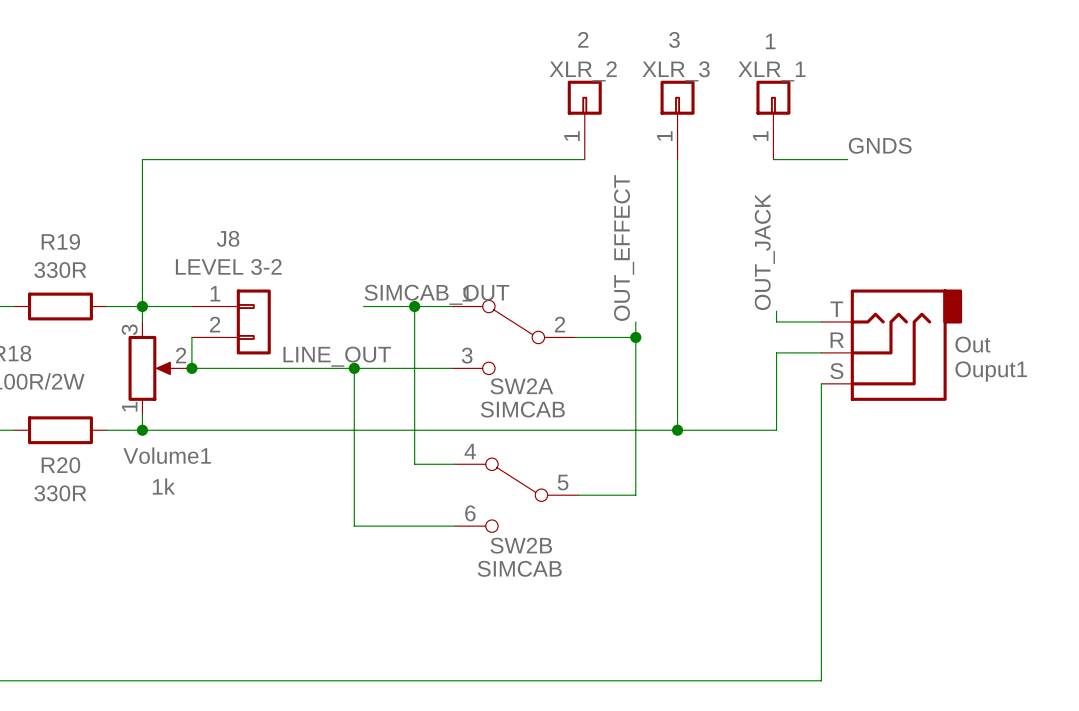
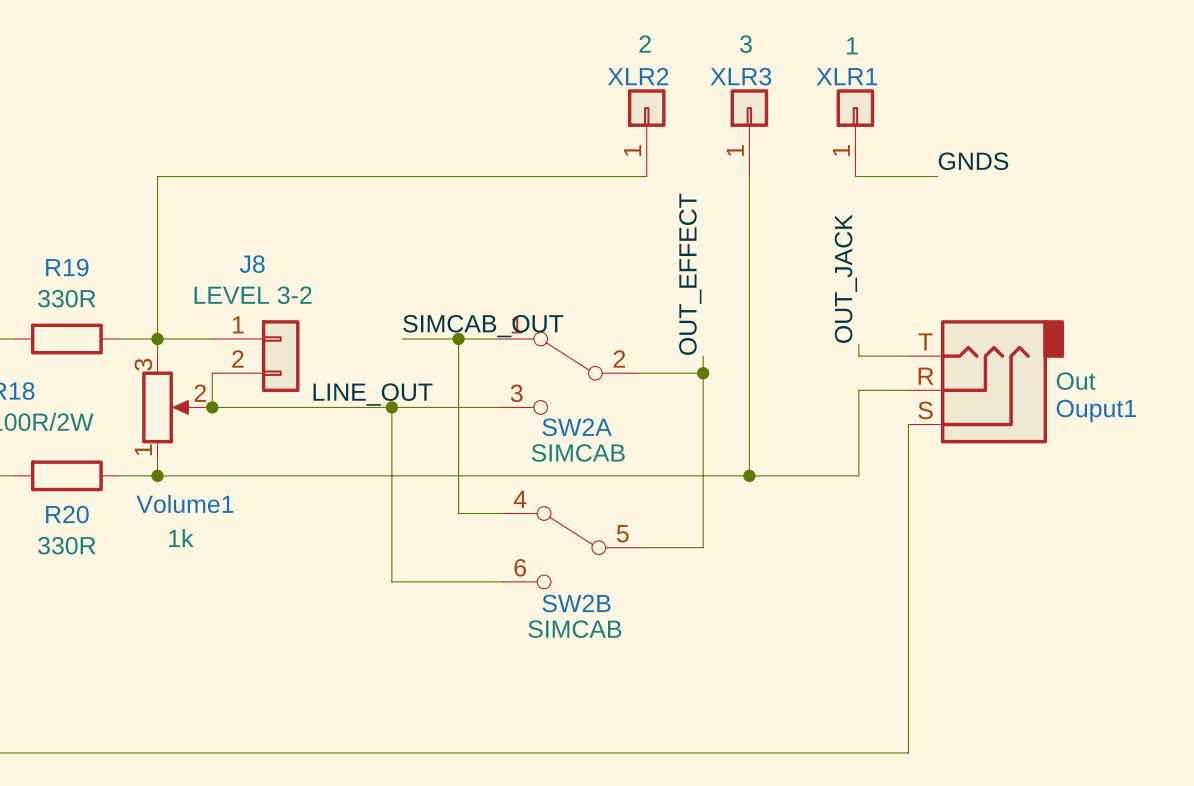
XLR_2 name: XLR_2 (583, 71) -> XLR2 (638, 76)
XLR_3 name: XLR_3 (676, 71) -> XLR3 (740, 76)
XLR_1 name: XLR_1 (771, 71) -> XLR1 (846, 76)

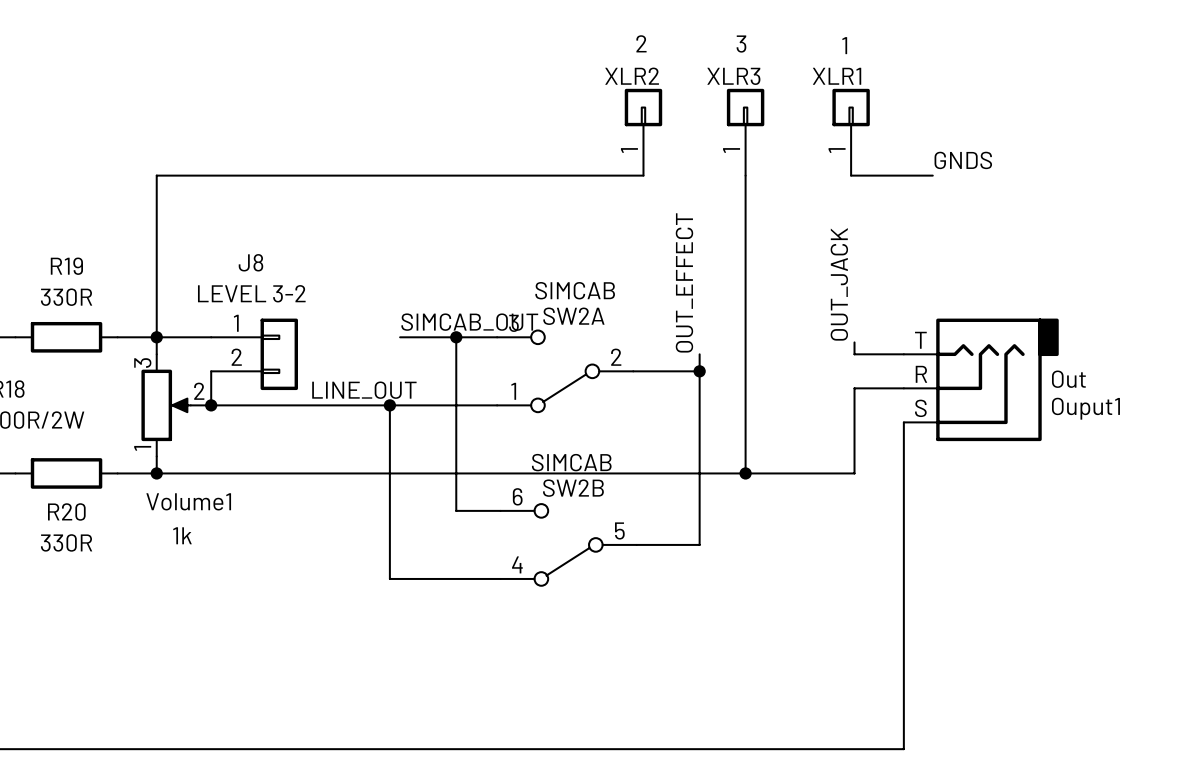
SW2A flip: as is (568, 373) -> up-down (565, 371)
SW2B flip: as is (571, 547) -> up-down (568, 544)

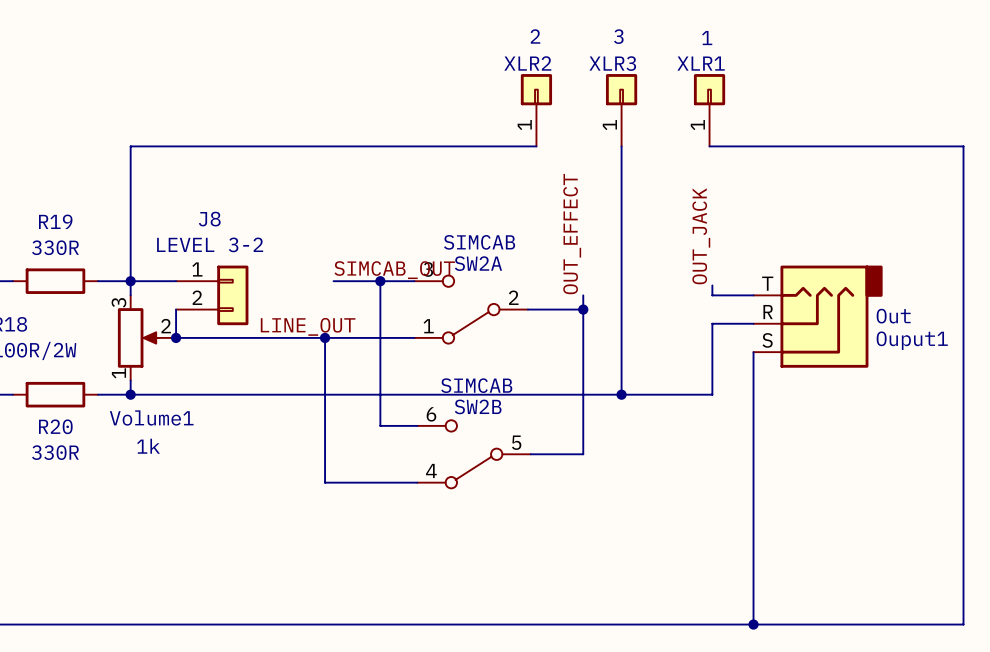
label: GNDS (963, 160) -> none
wire: none -> (777, 146) (963, 146) (963, 624) (753, 624)
junction: none -> (753, 624)

